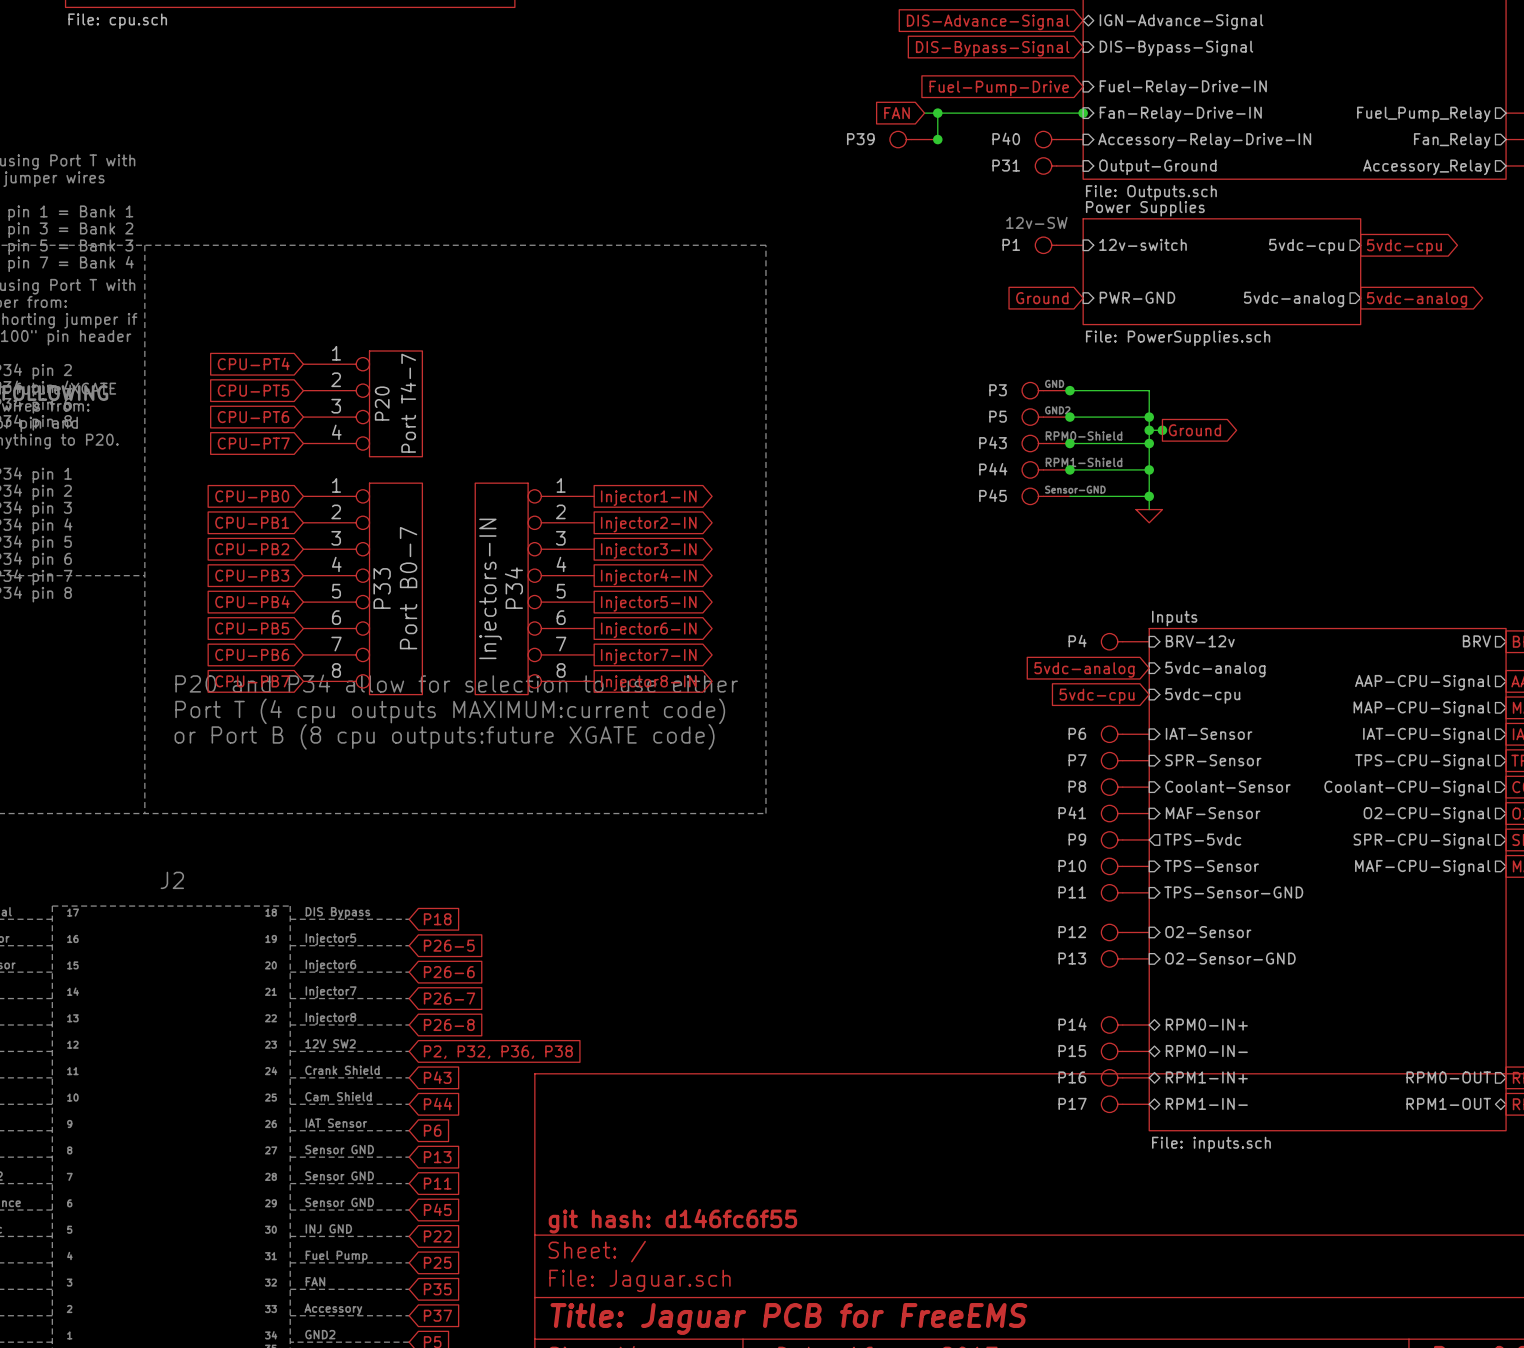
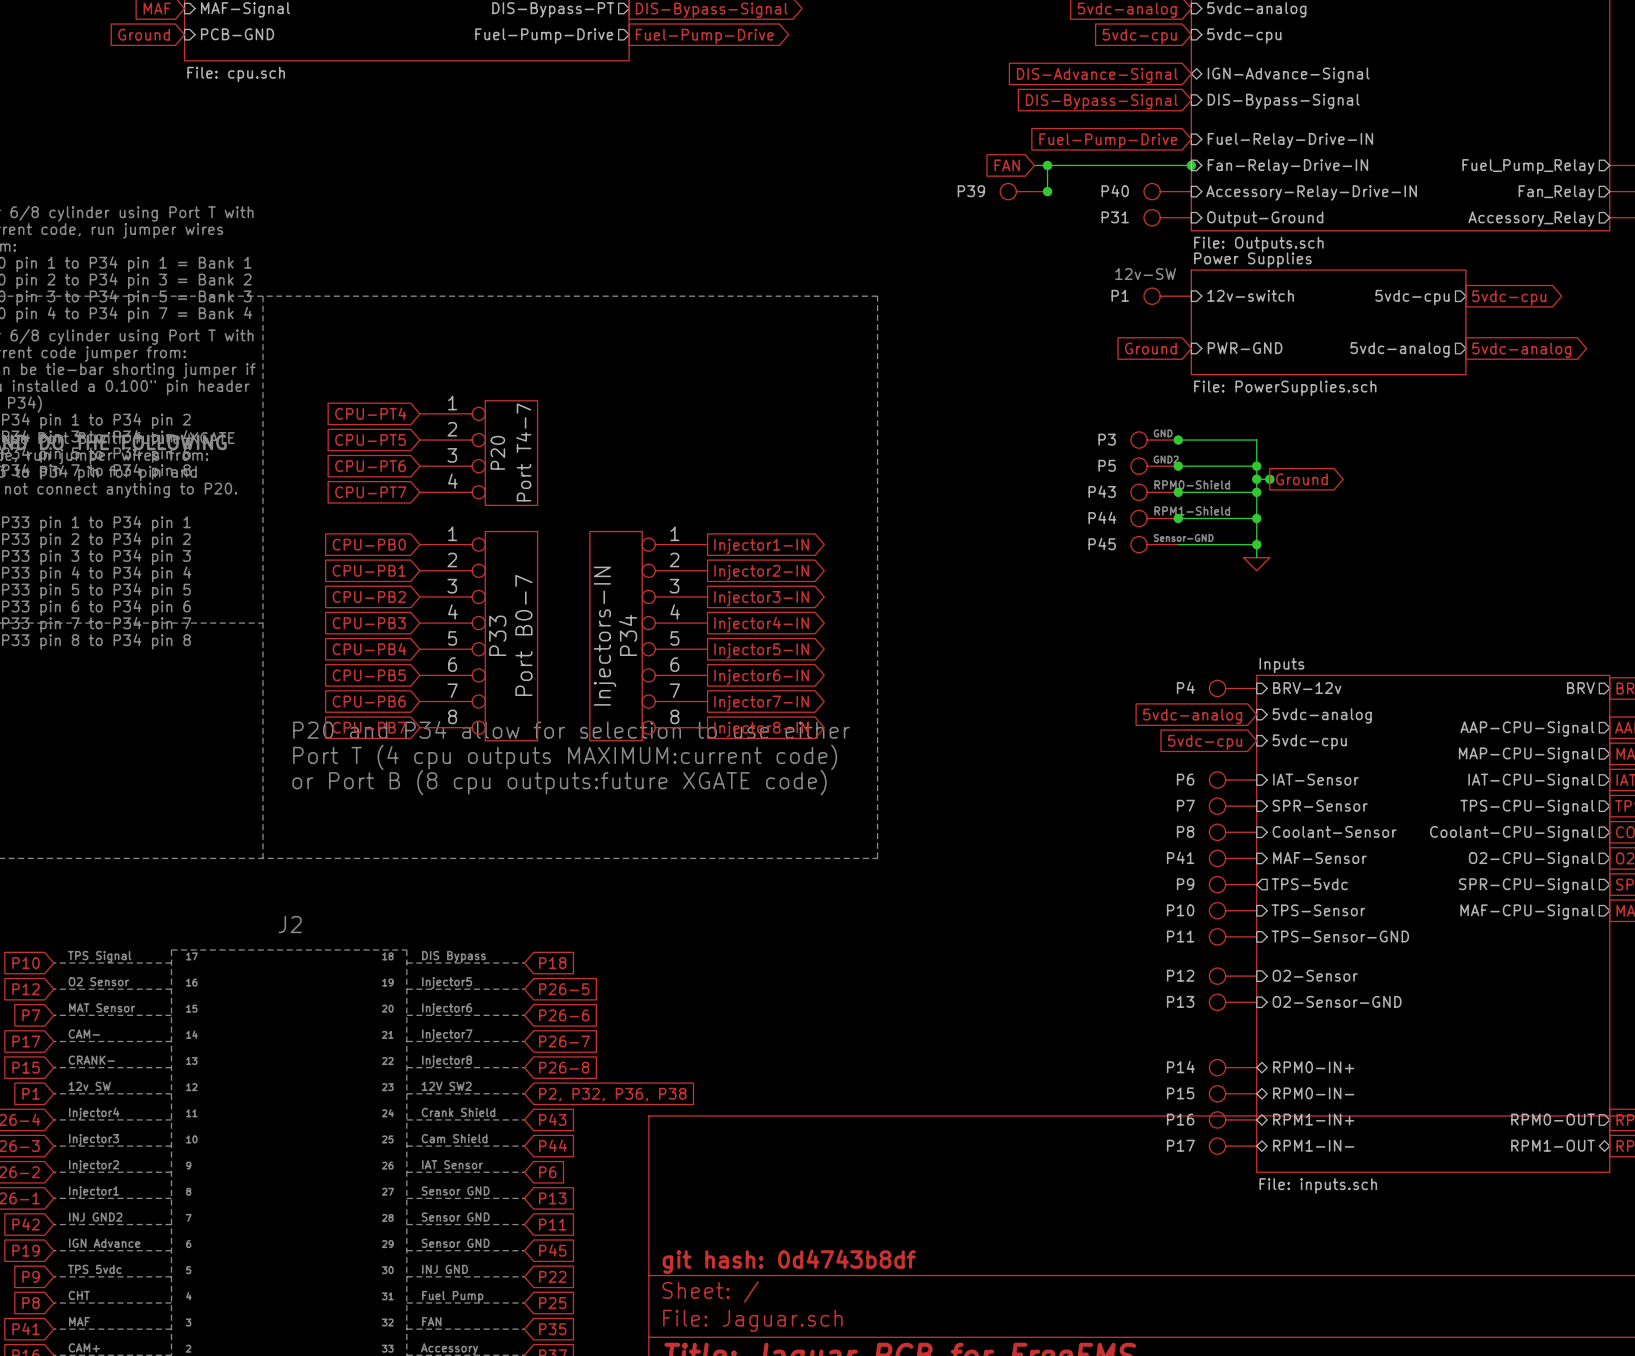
title block: git hash: d146fc6f55 (672, 1221) -> git hash: 0d4743b8df (789, 1261)

